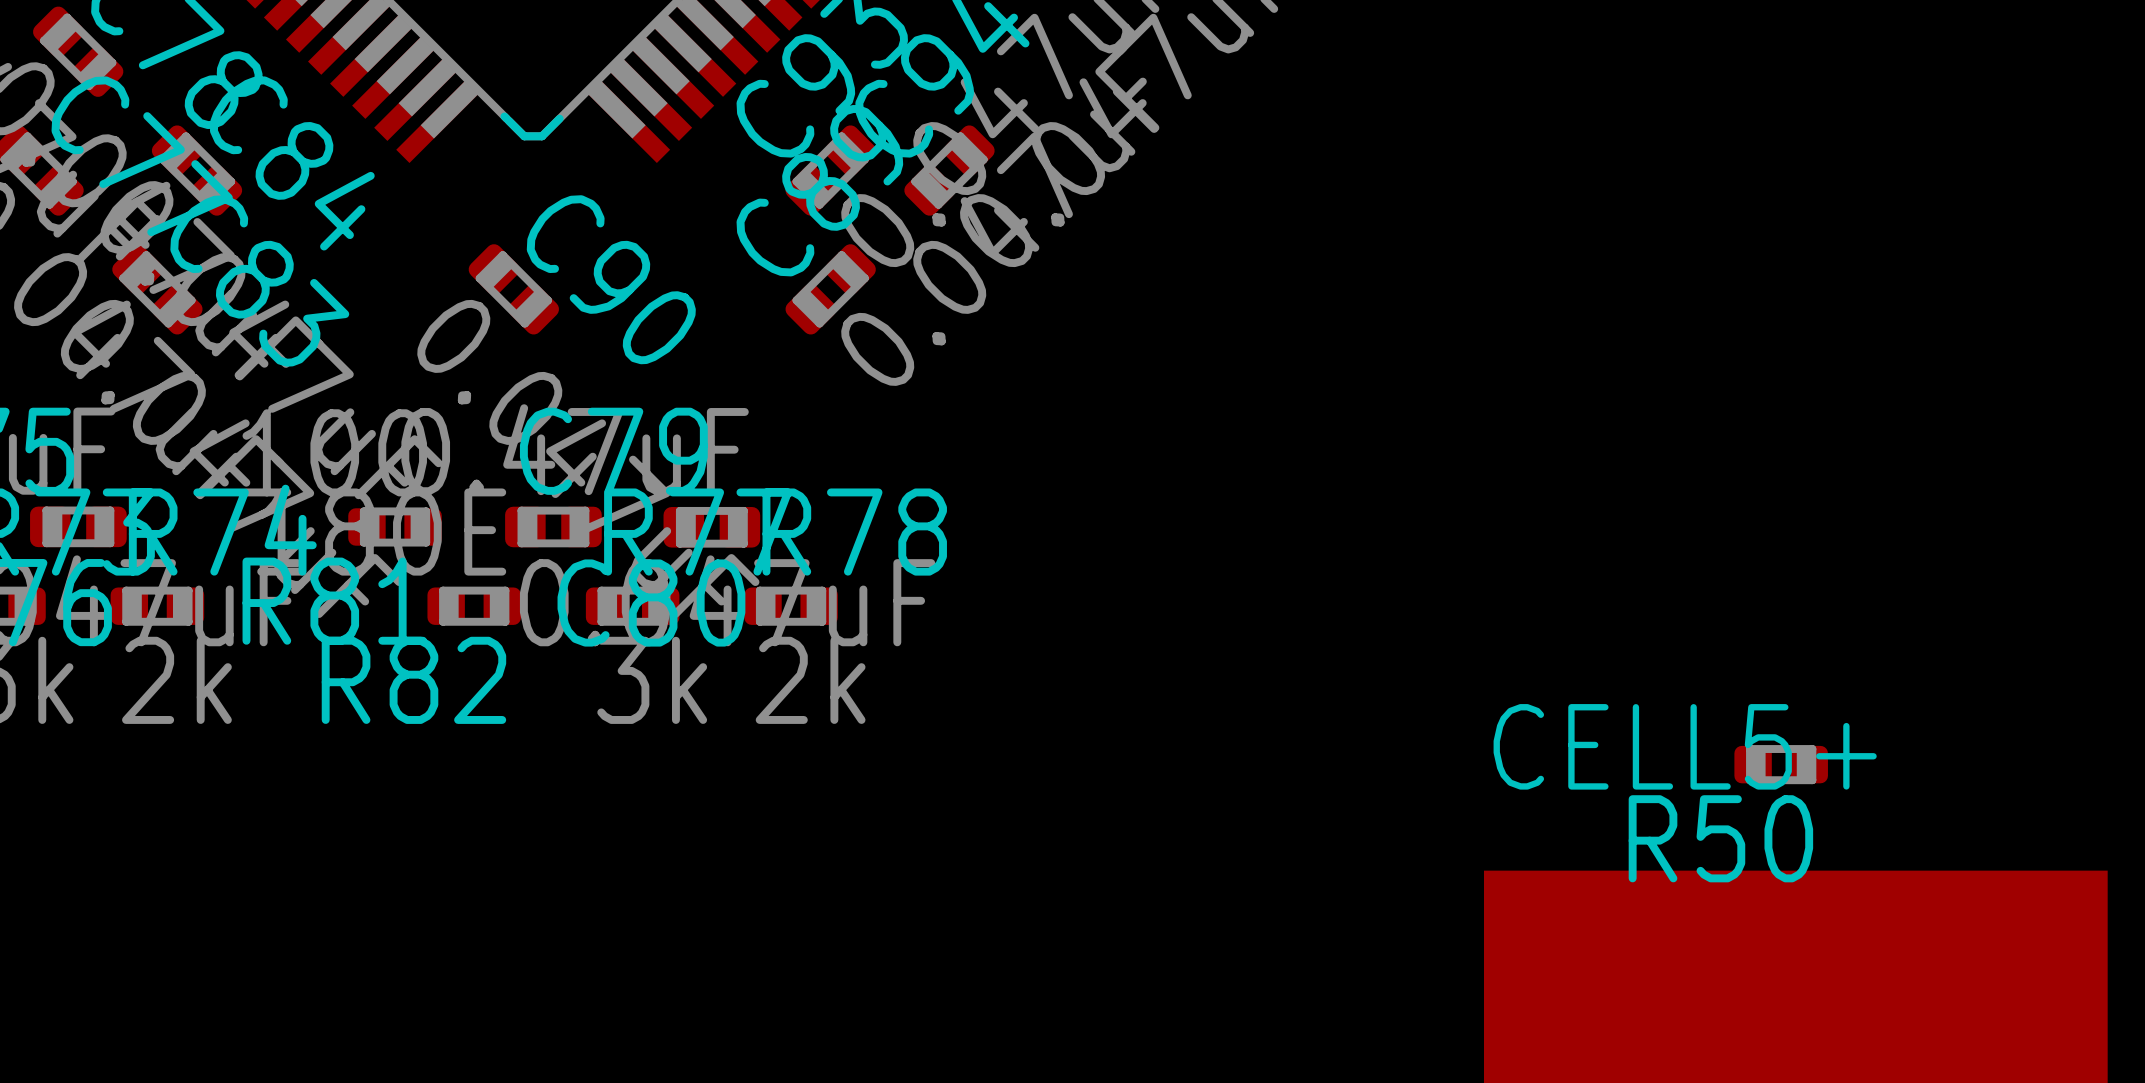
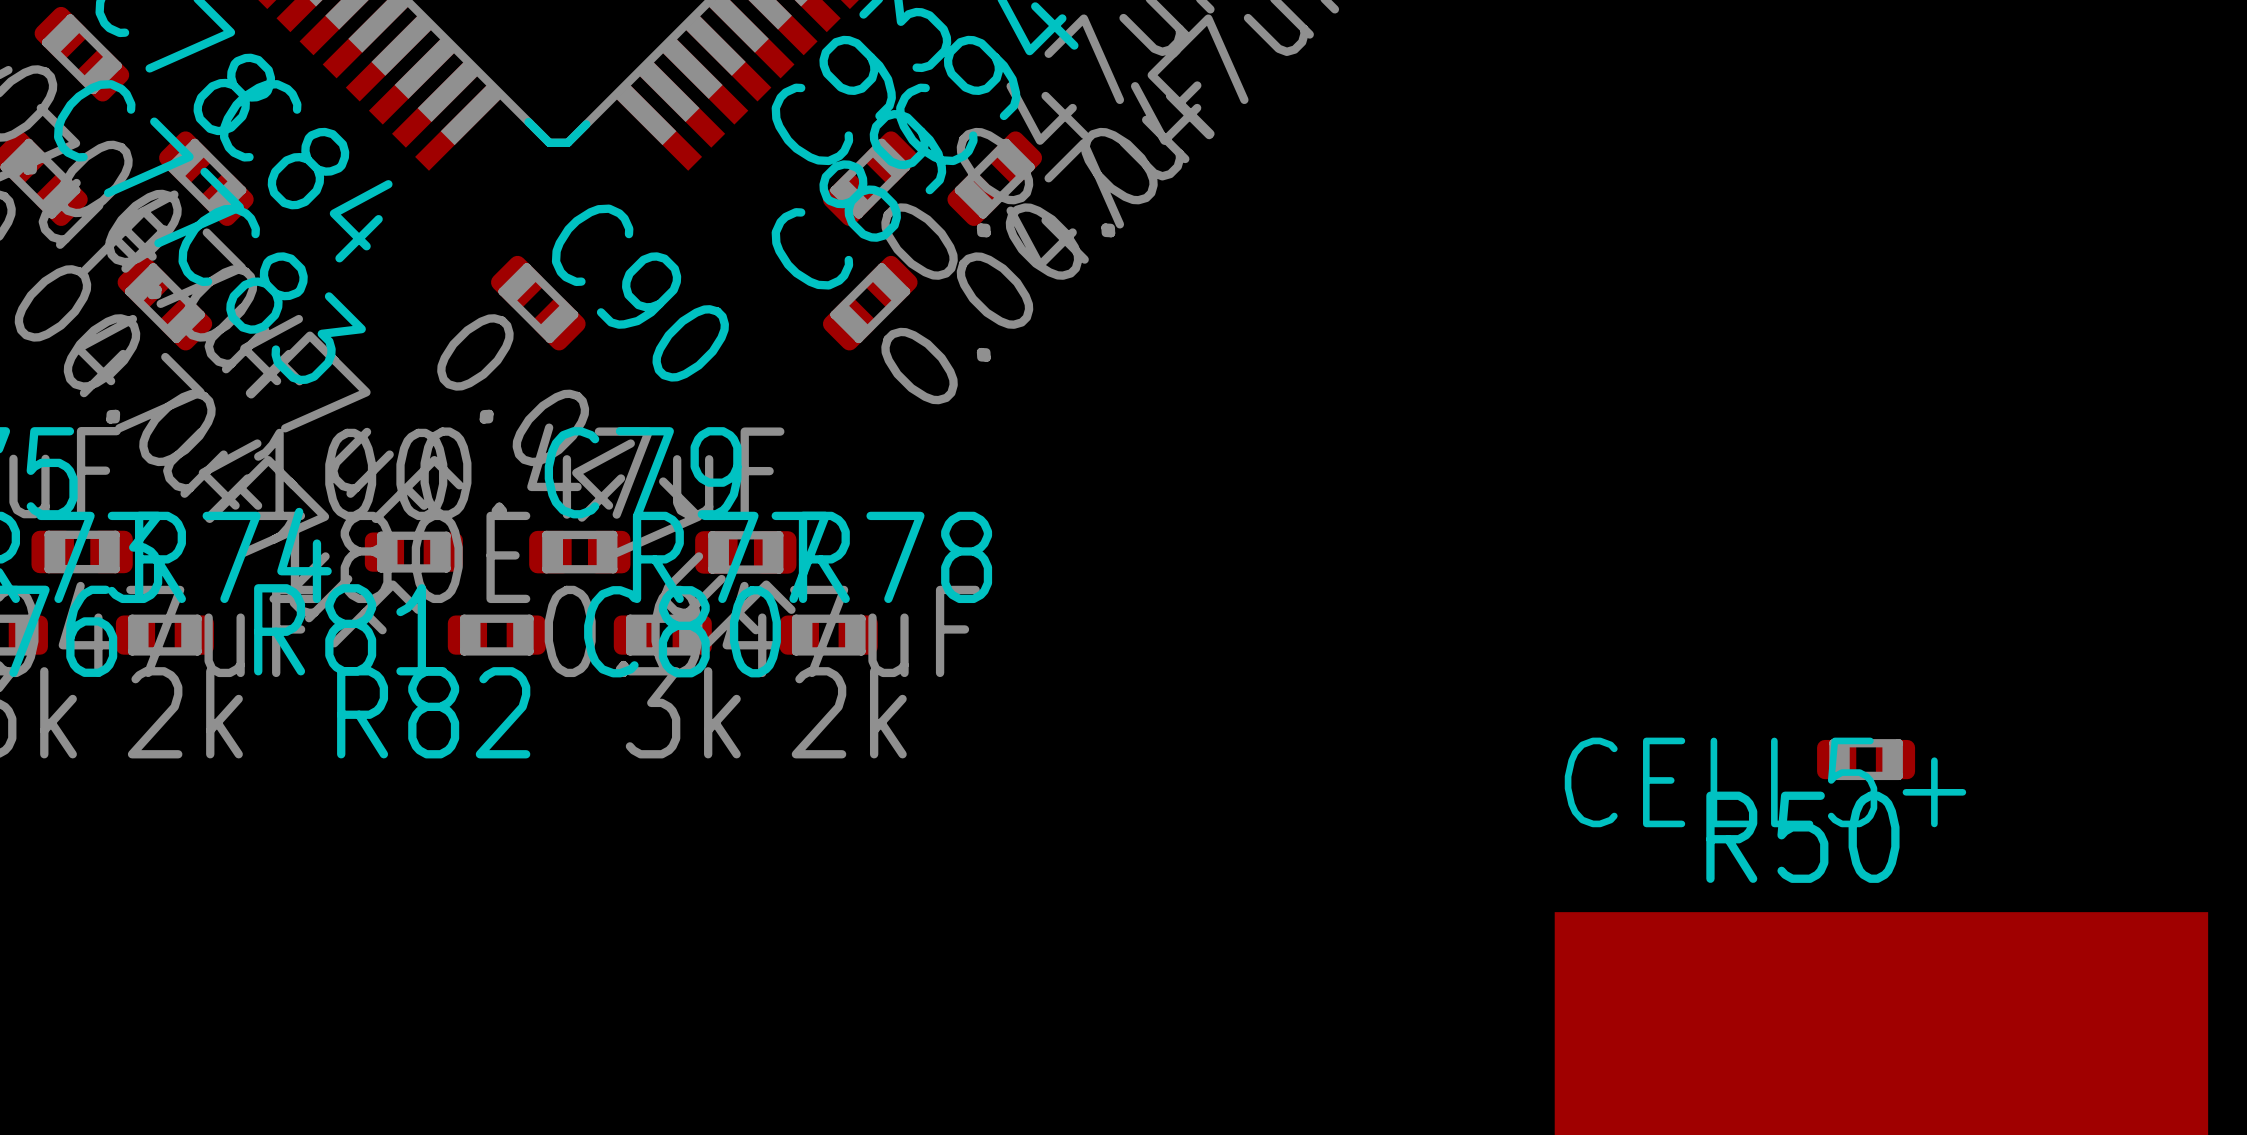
R50 position: (1781, 764) -> (1866, 759)

